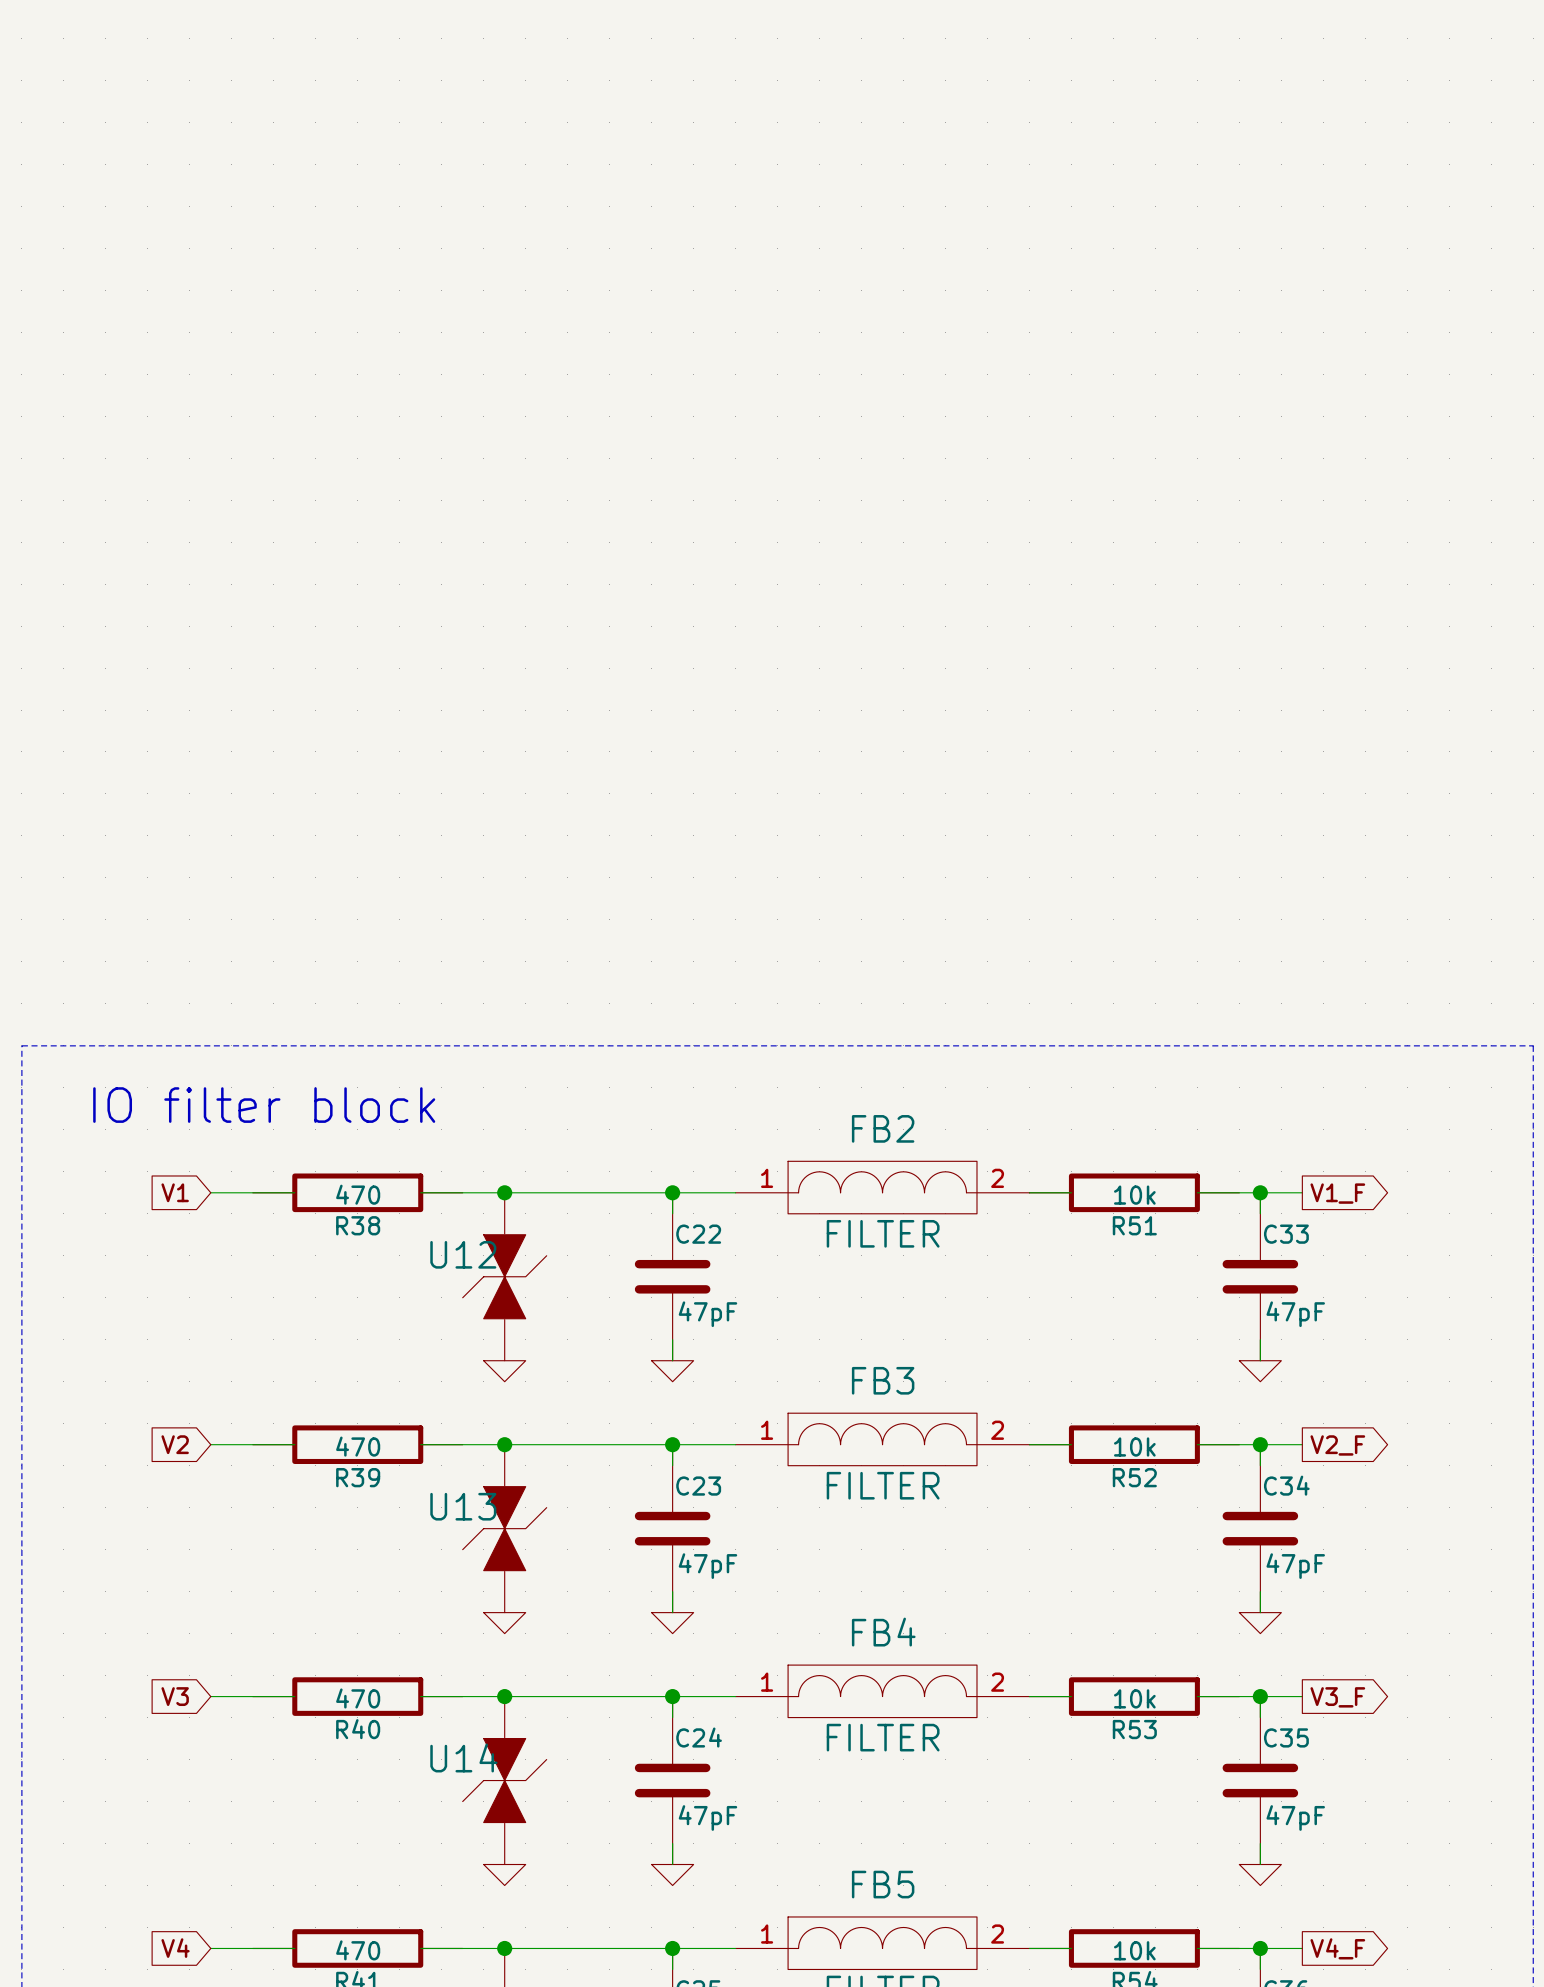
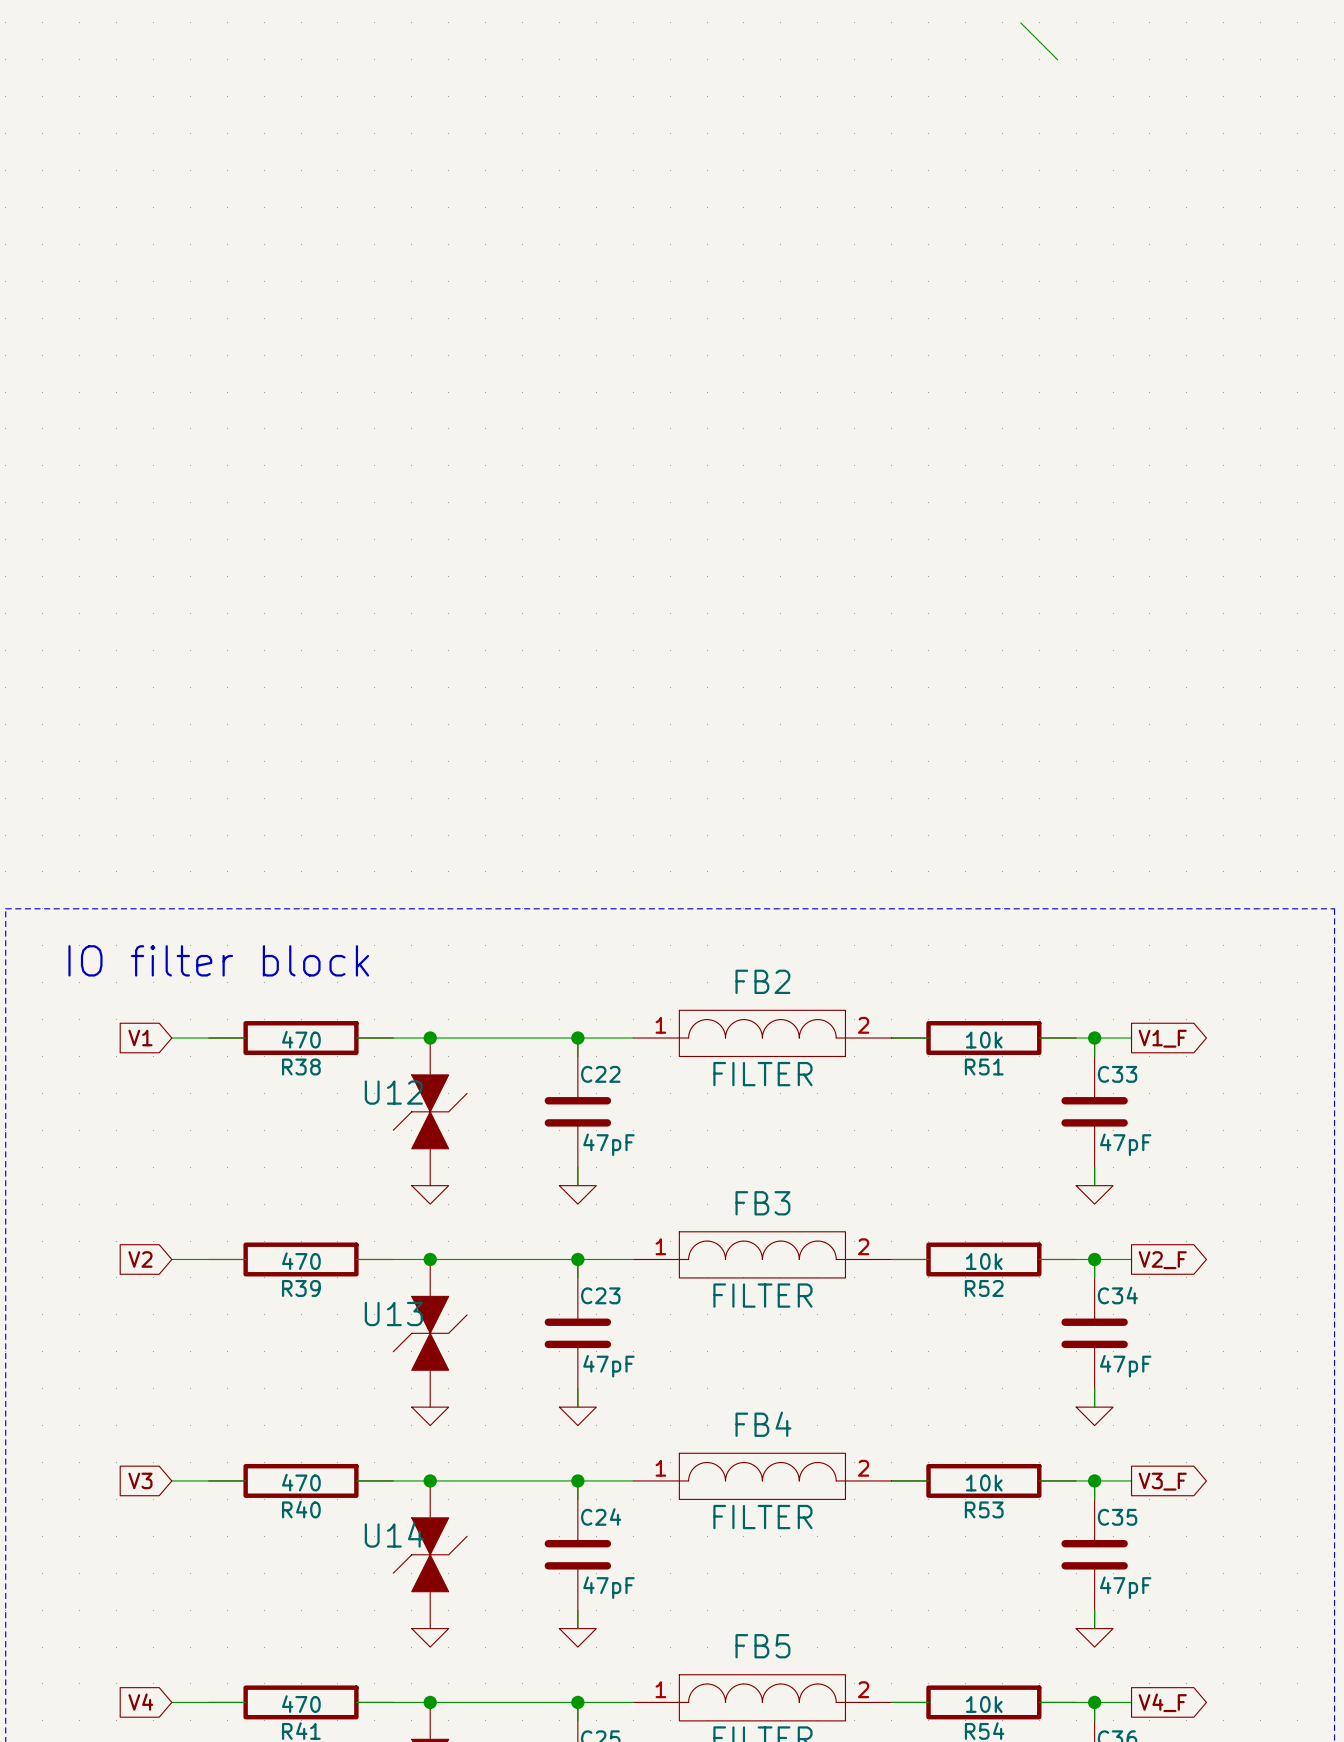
wire: none -> (1020, 22) (1057, 59)

